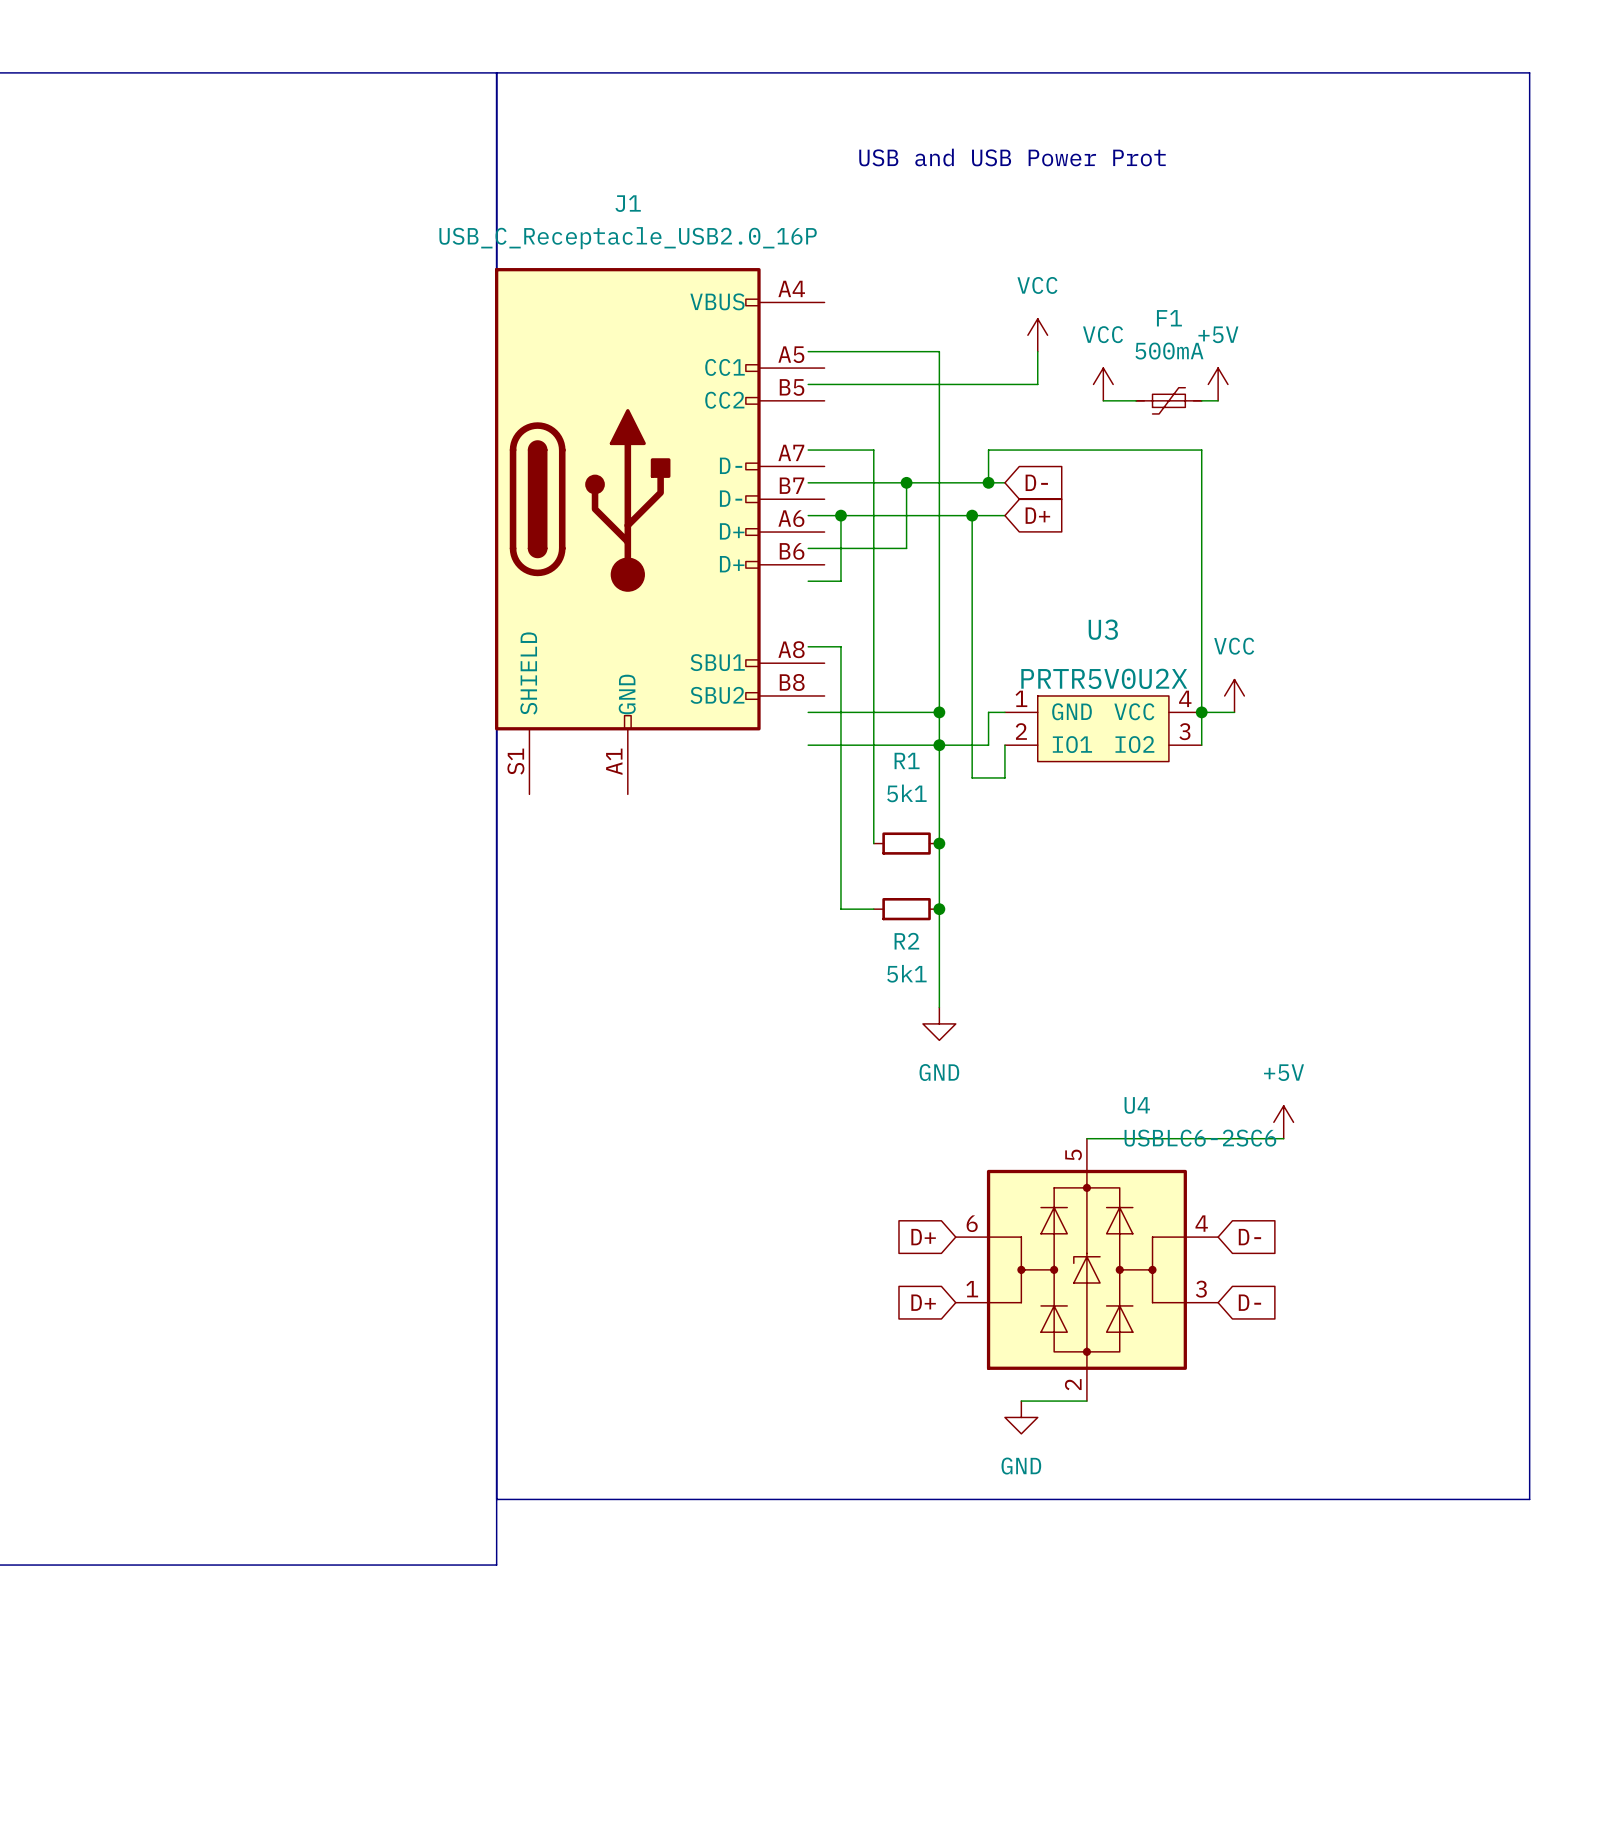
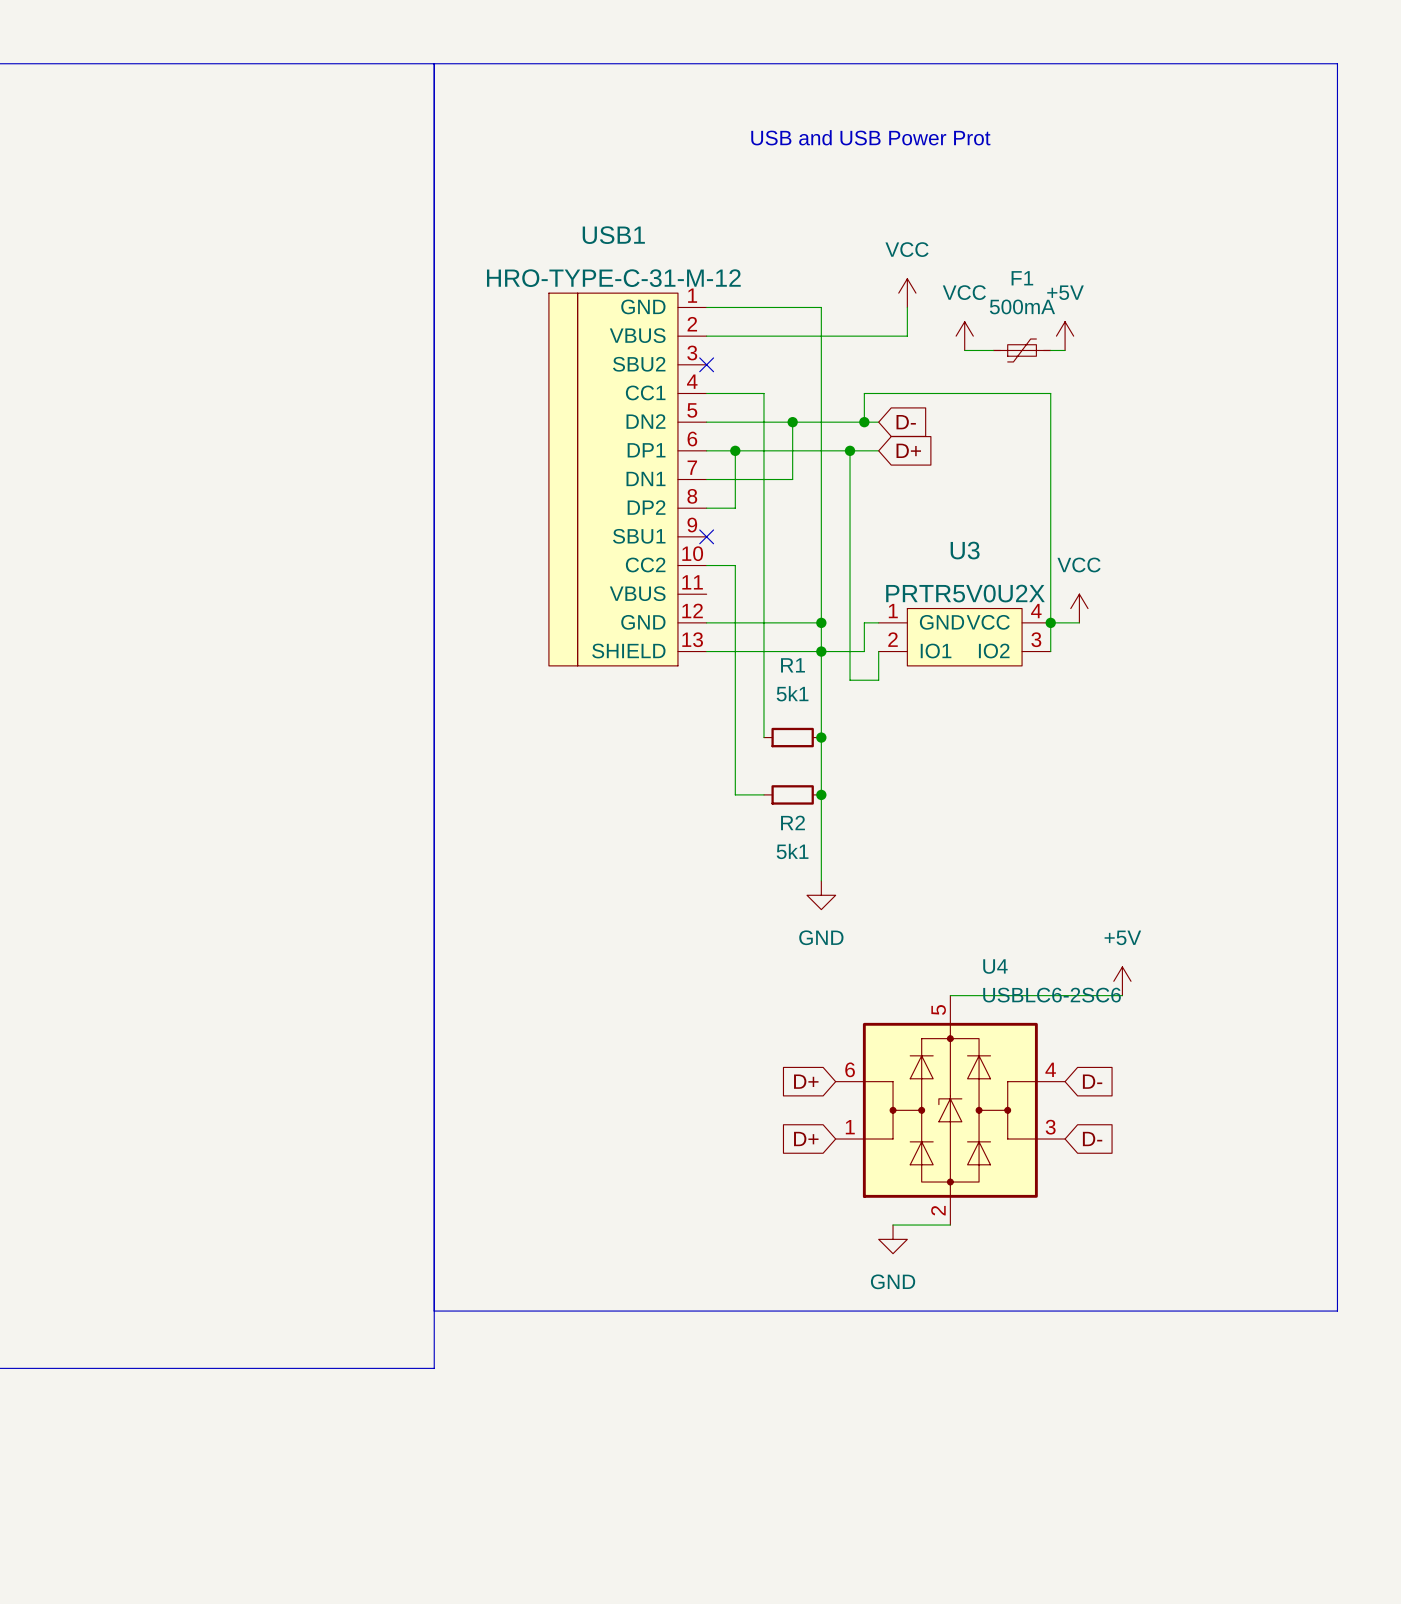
no-connect mark: none -> (706, 364)
J1: USB_C_Receptacle_USB2.0_16P (659, 531) -> none
USB1: none -> HRO-TYPE-C-31-M-12 (627, 479)
no-connect mark: none -> (706, 536)

